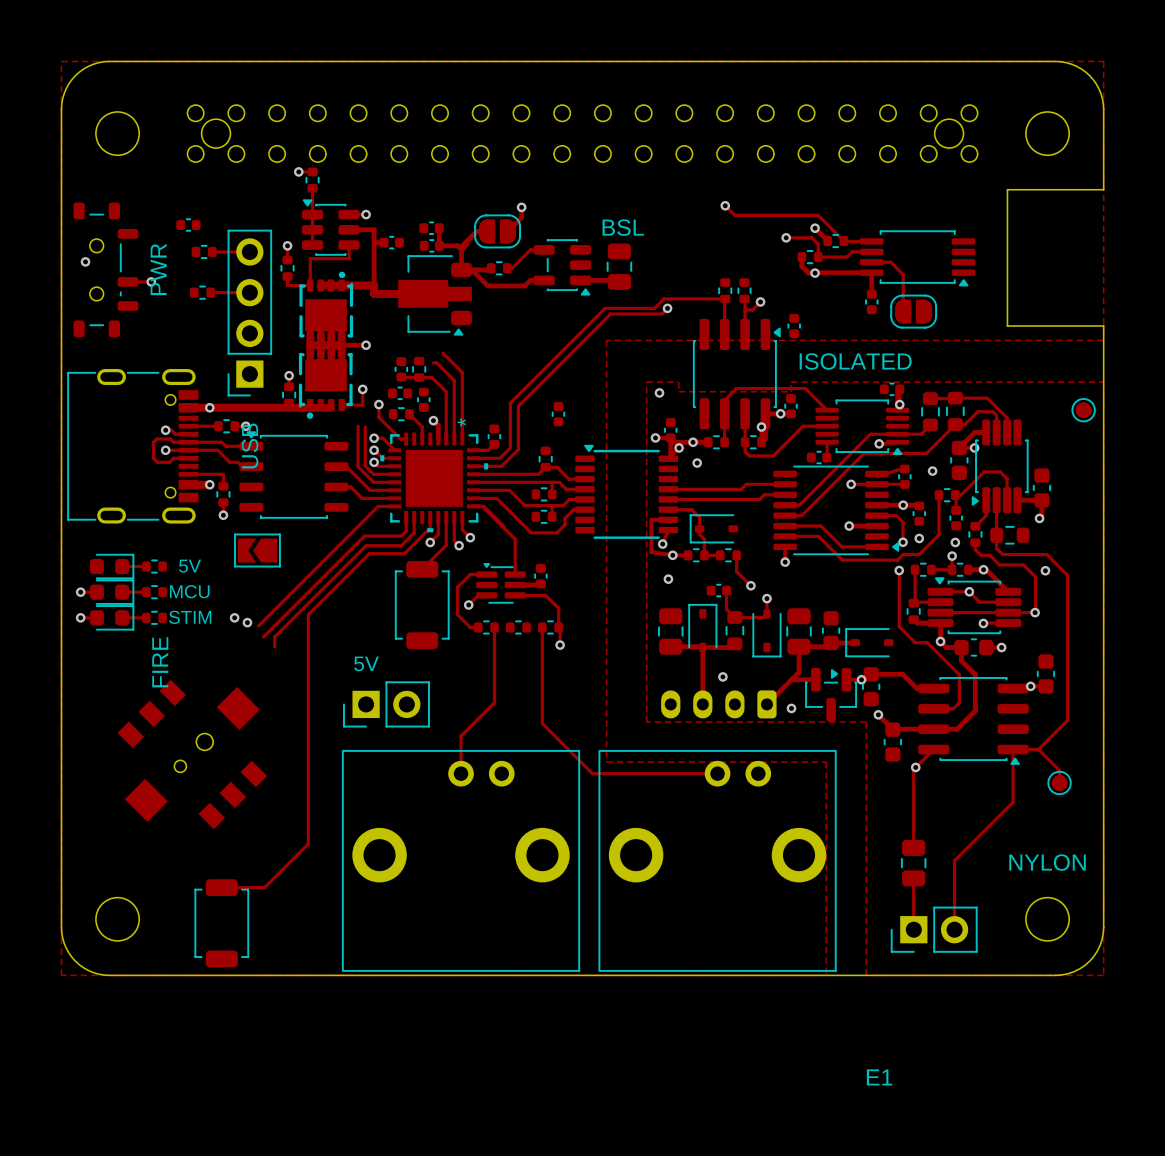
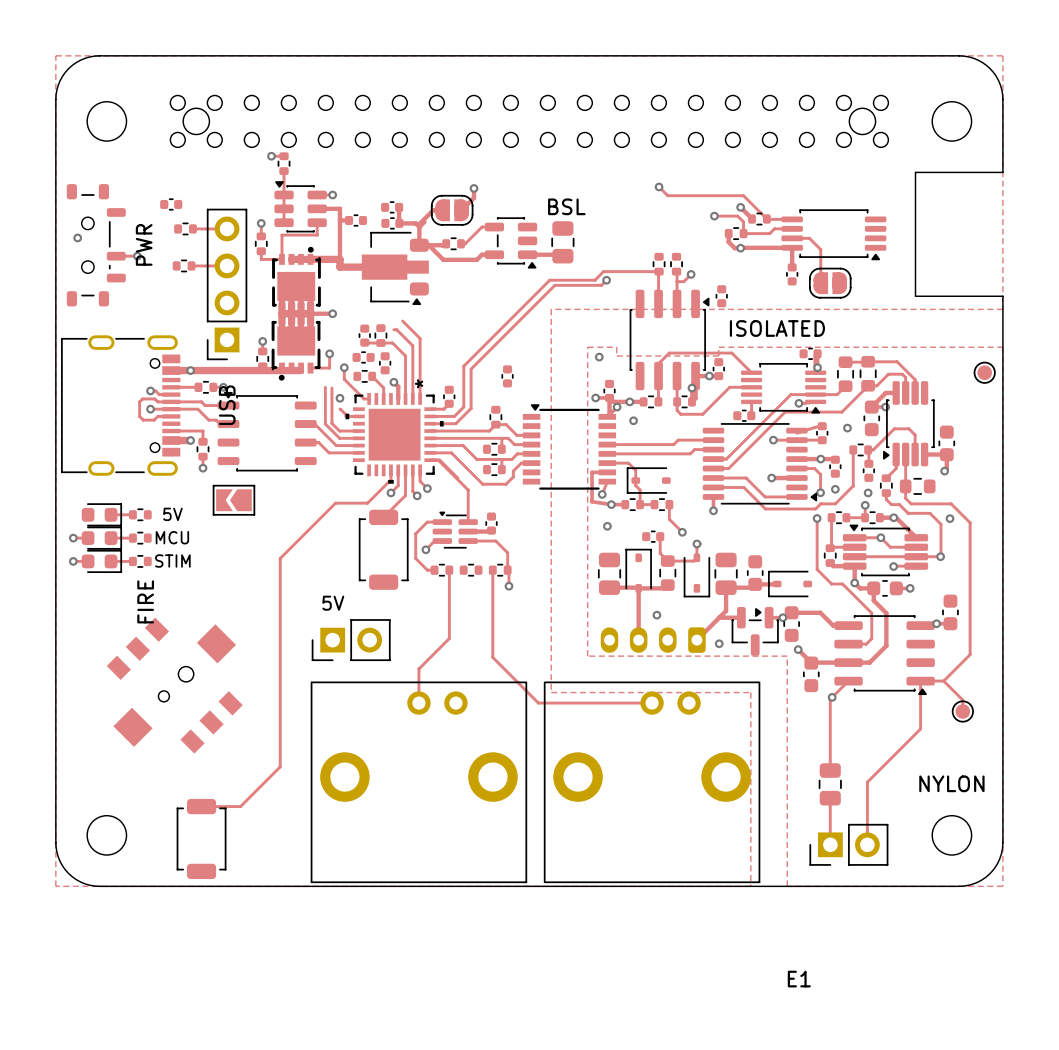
track: (374, 438) (382, 438) (394, 450) -> none
via: (374, 450) -> none
track: (374, 462) (378, 466) (394, 466) -> none
via: (374, 462) -> none
track: (394, 506) (378, 506) (258, 625) -> none
track: (406, 517) (406, 531) (401, 536) (364, 536) (263, 637) -> none
track: (414, 517) (414, 532) (401, 545) (366, 545) (274, 637) (274, 646) -> none
via: (234, 617) -> none
via: (247, 622) -> none

